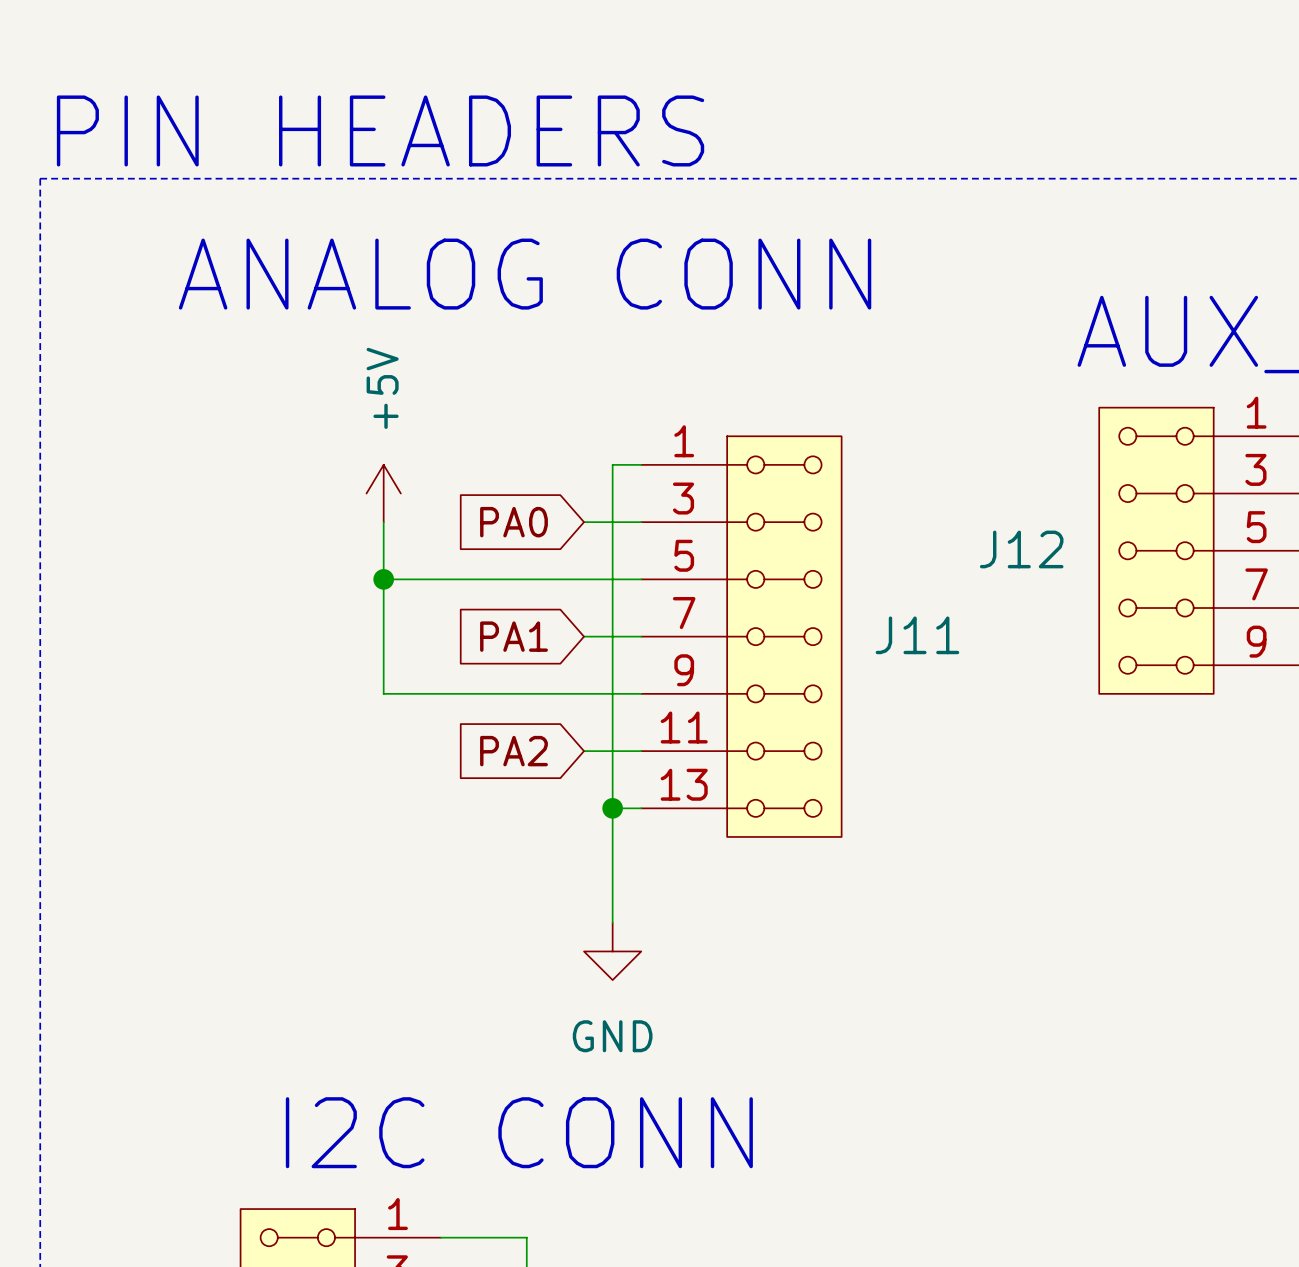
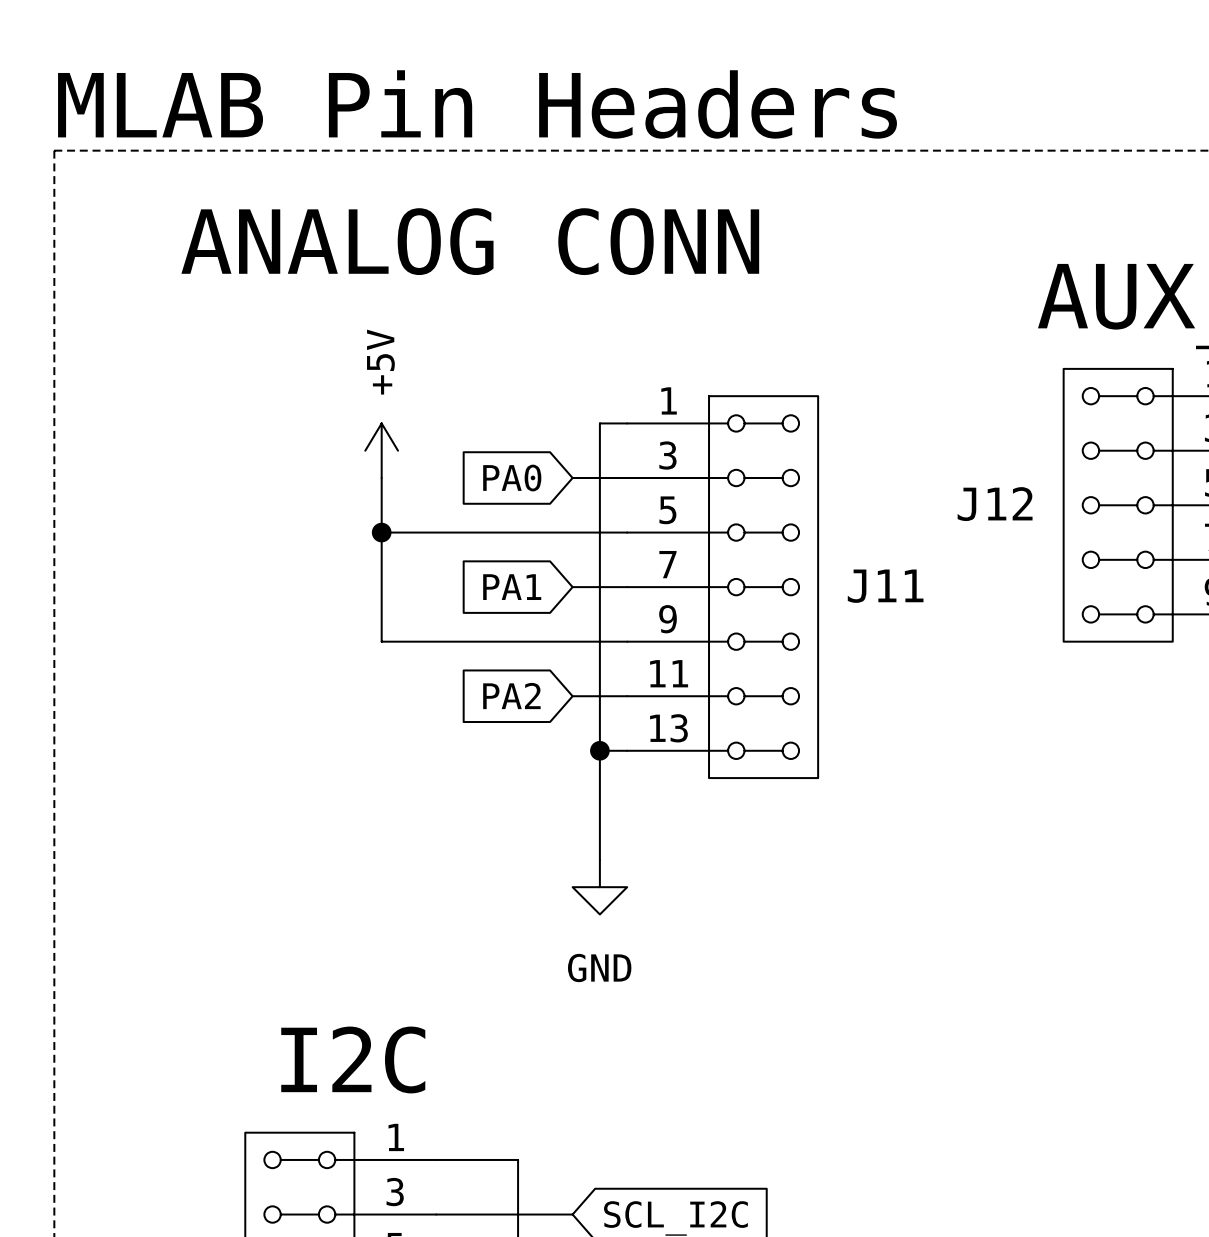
text: PIN HEADERS (380, 130) -> MLAB Pin Headers (477, 104)
text: I2C CONN (519, 1132) -> I2C (353, 1059)

